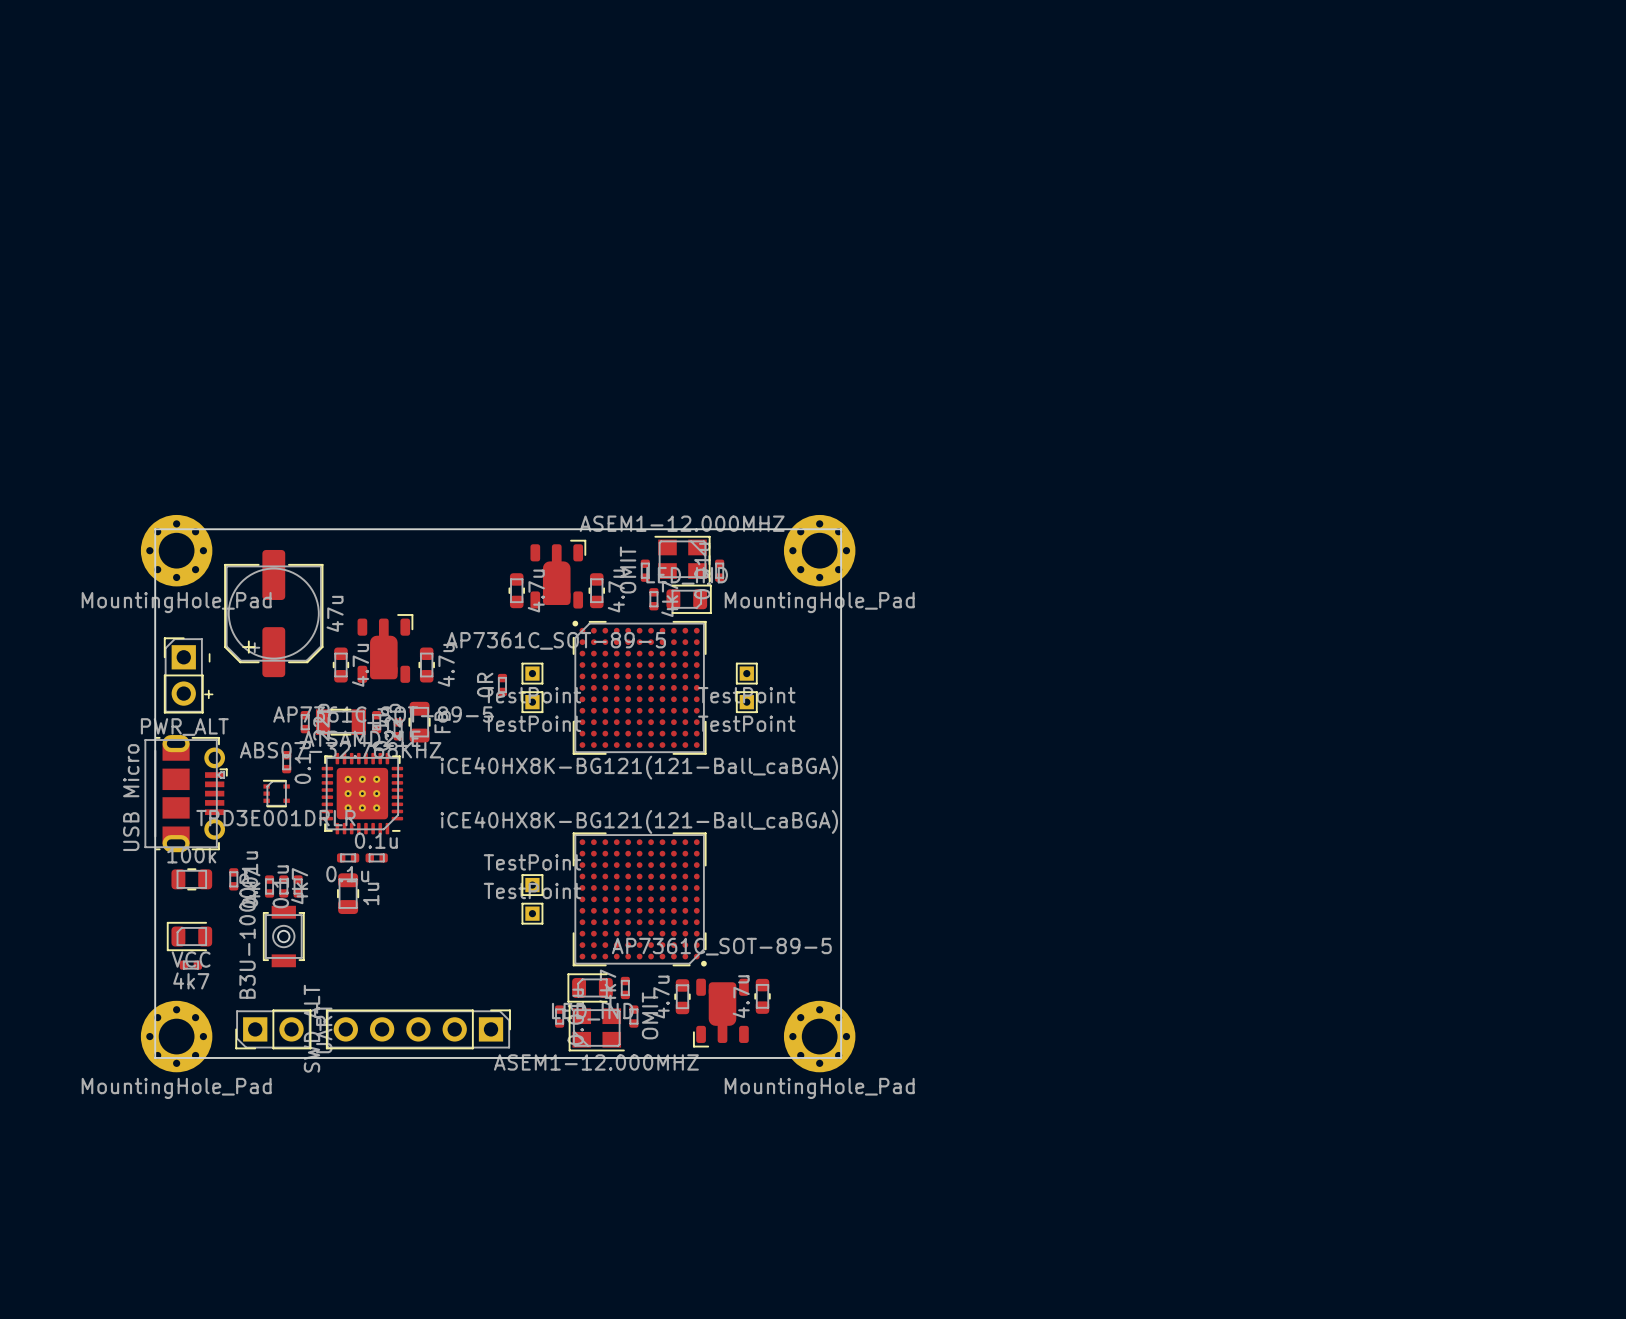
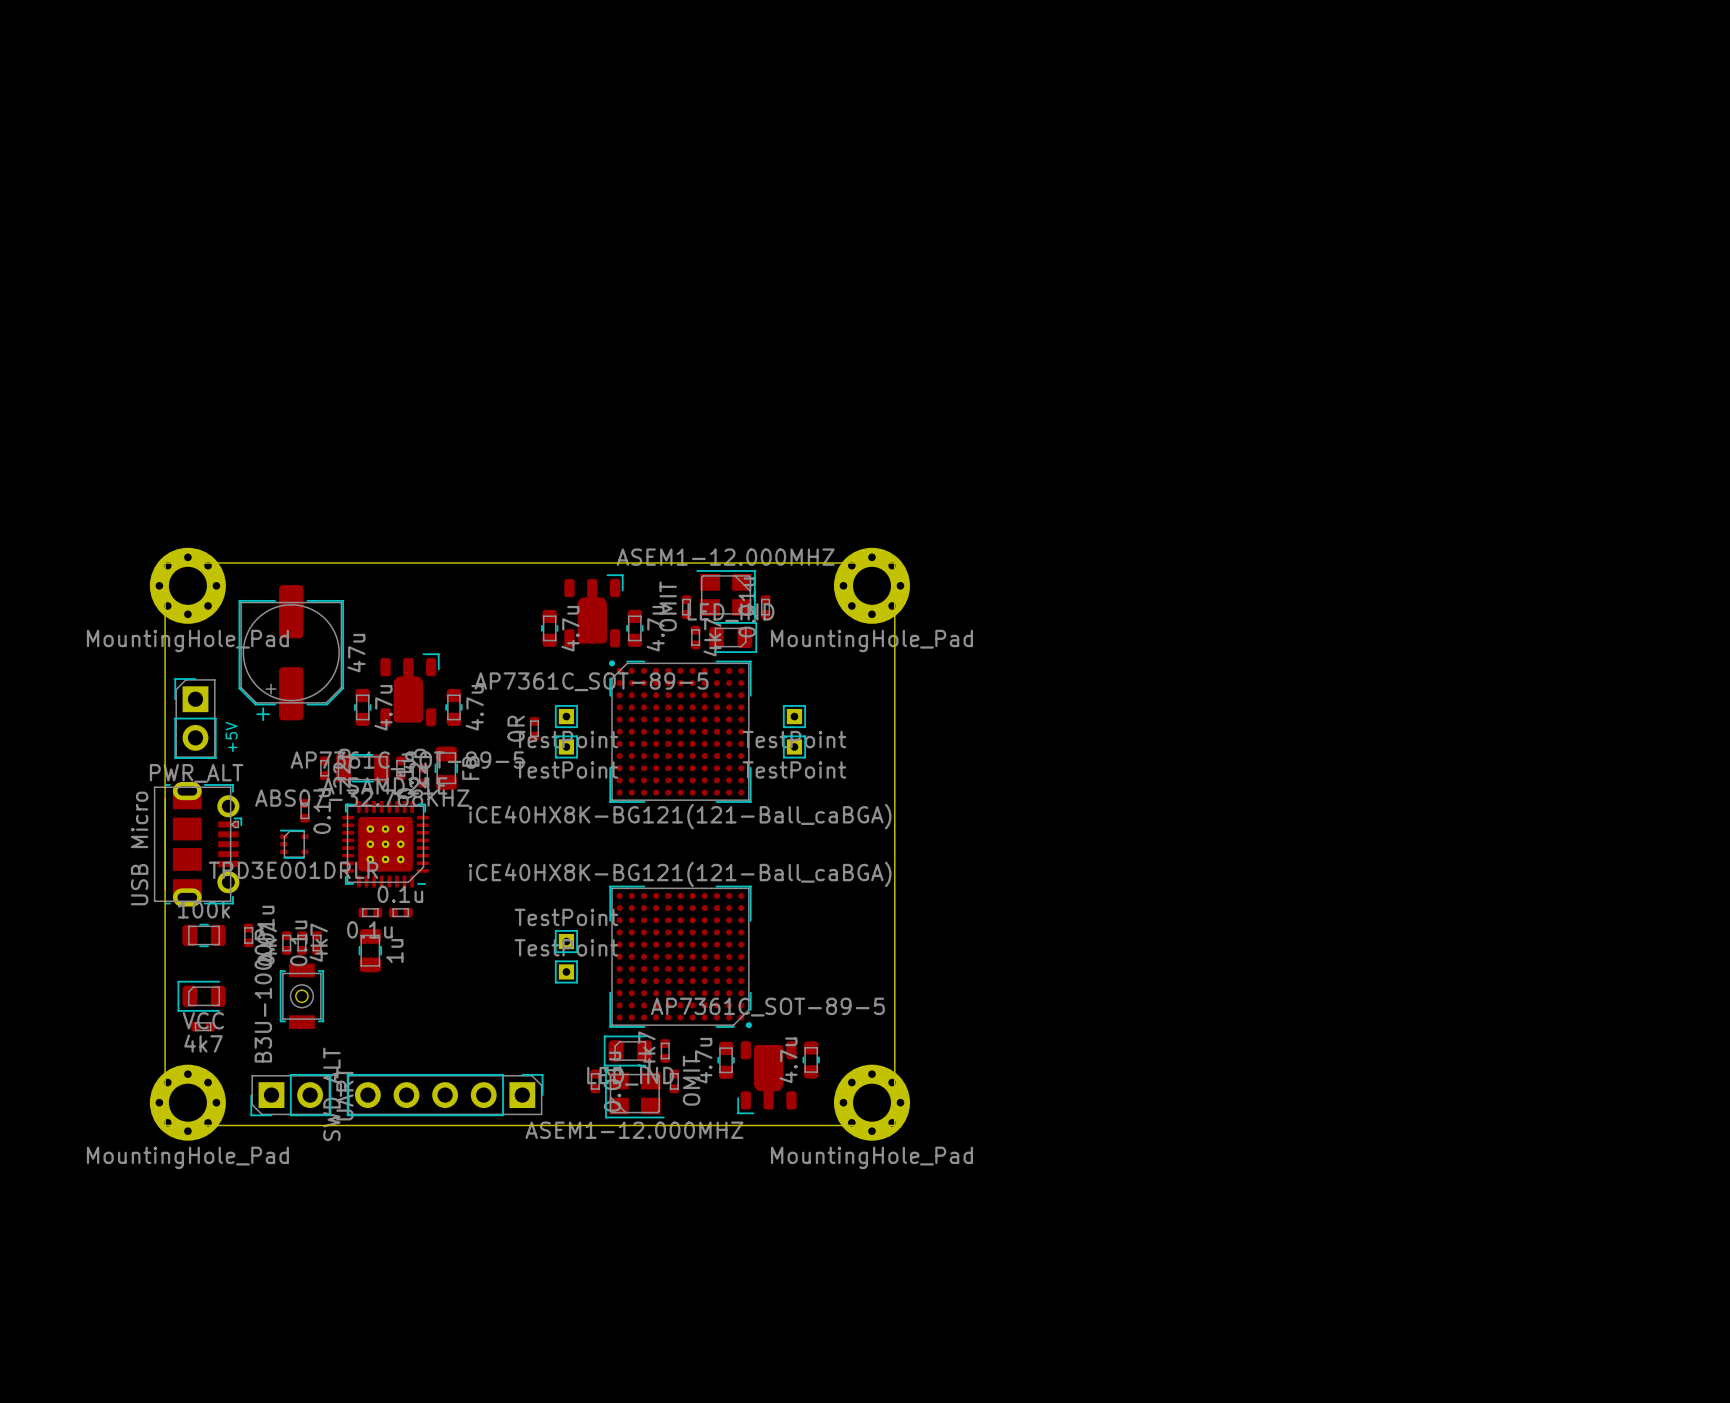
part footprint: [224, 549, 324, 678] -> [238, 585, 345, 722]
text: - (209, 657) -> none
text: + (208, 694) -> +5V (231, 737)

